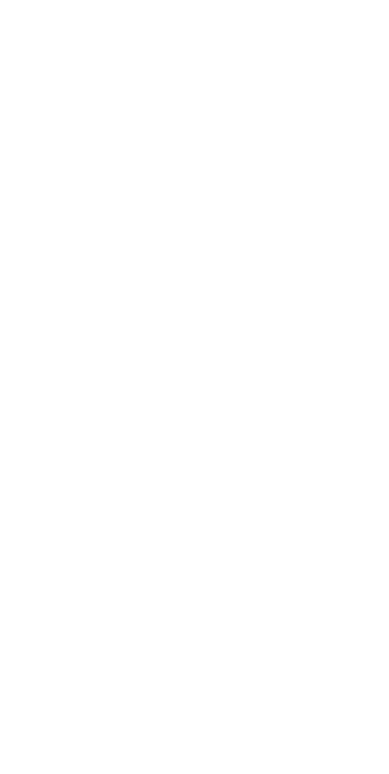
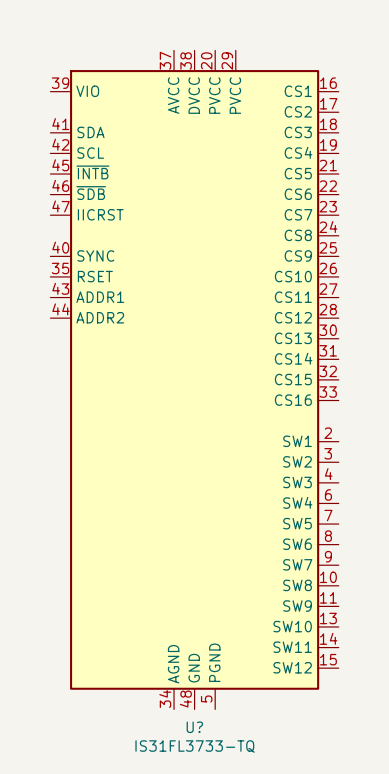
U?: none -> IS31FL3733-TQ (194, 379)

